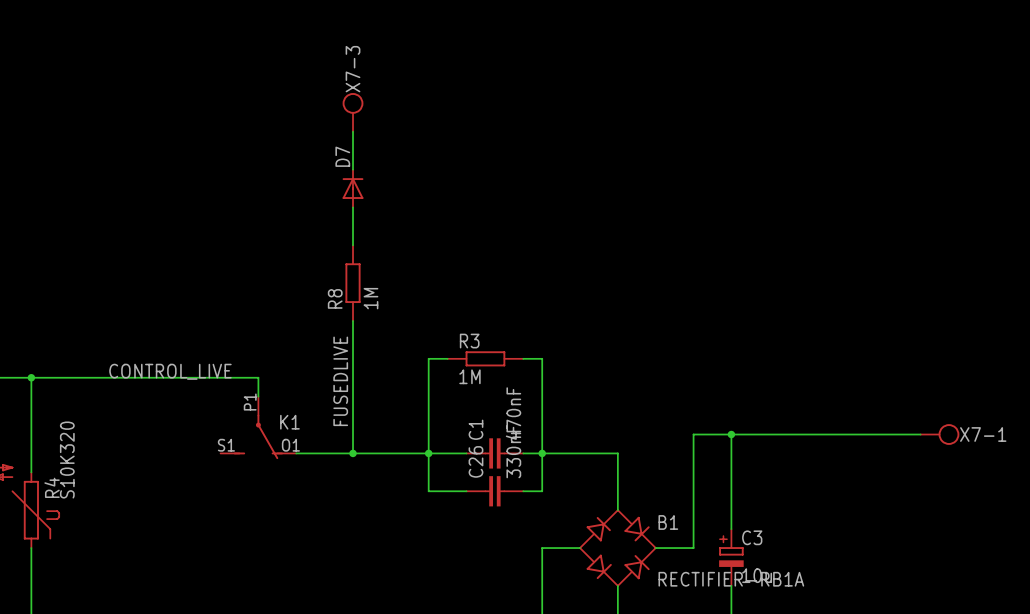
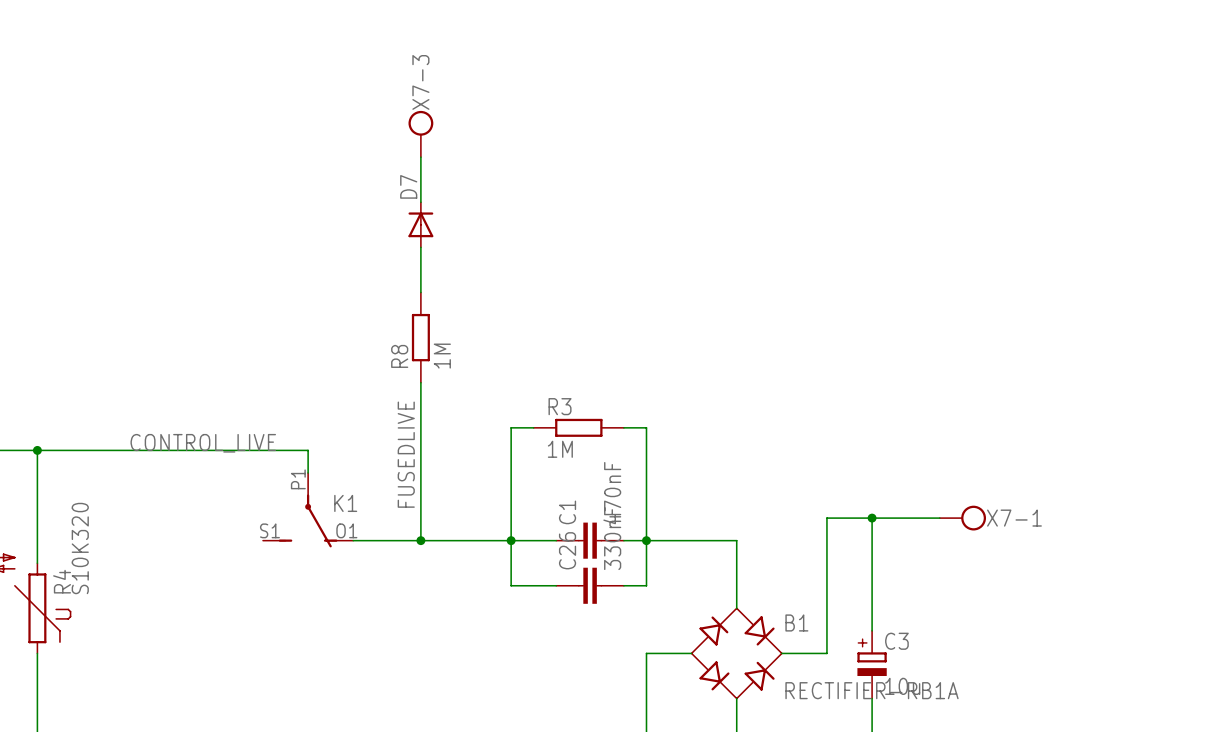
wire: (788, 434) (920, 434) -> none
X7-1 position: (939, 434) -> (962, 518)

